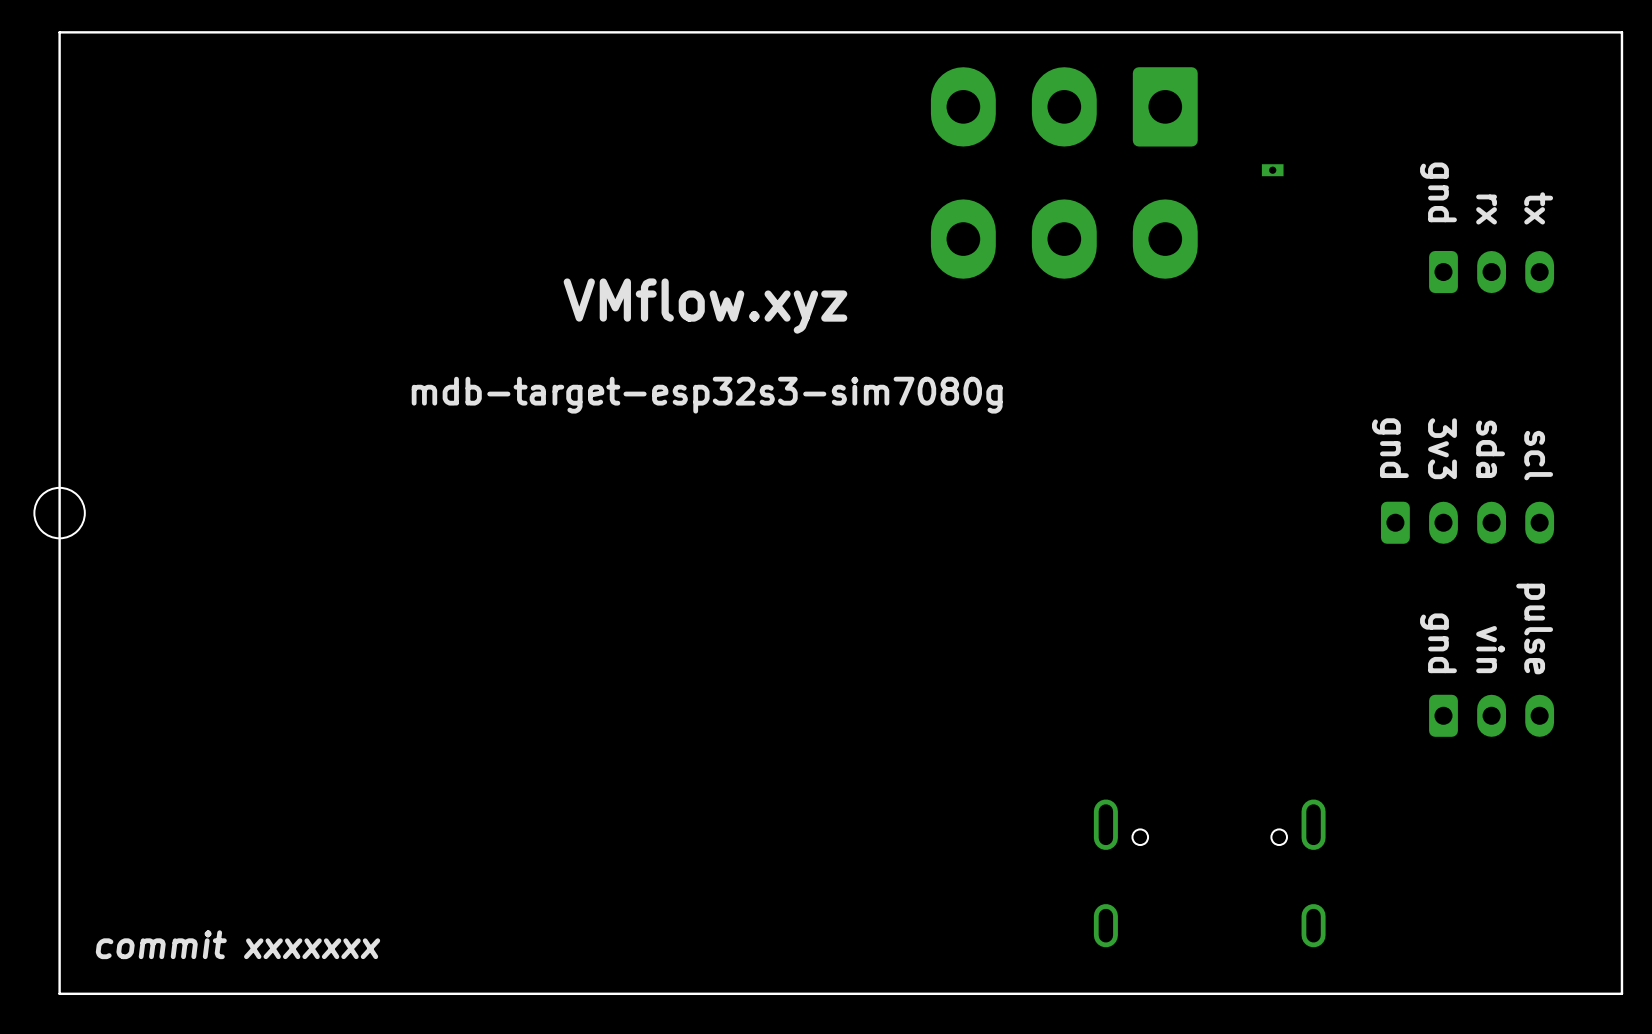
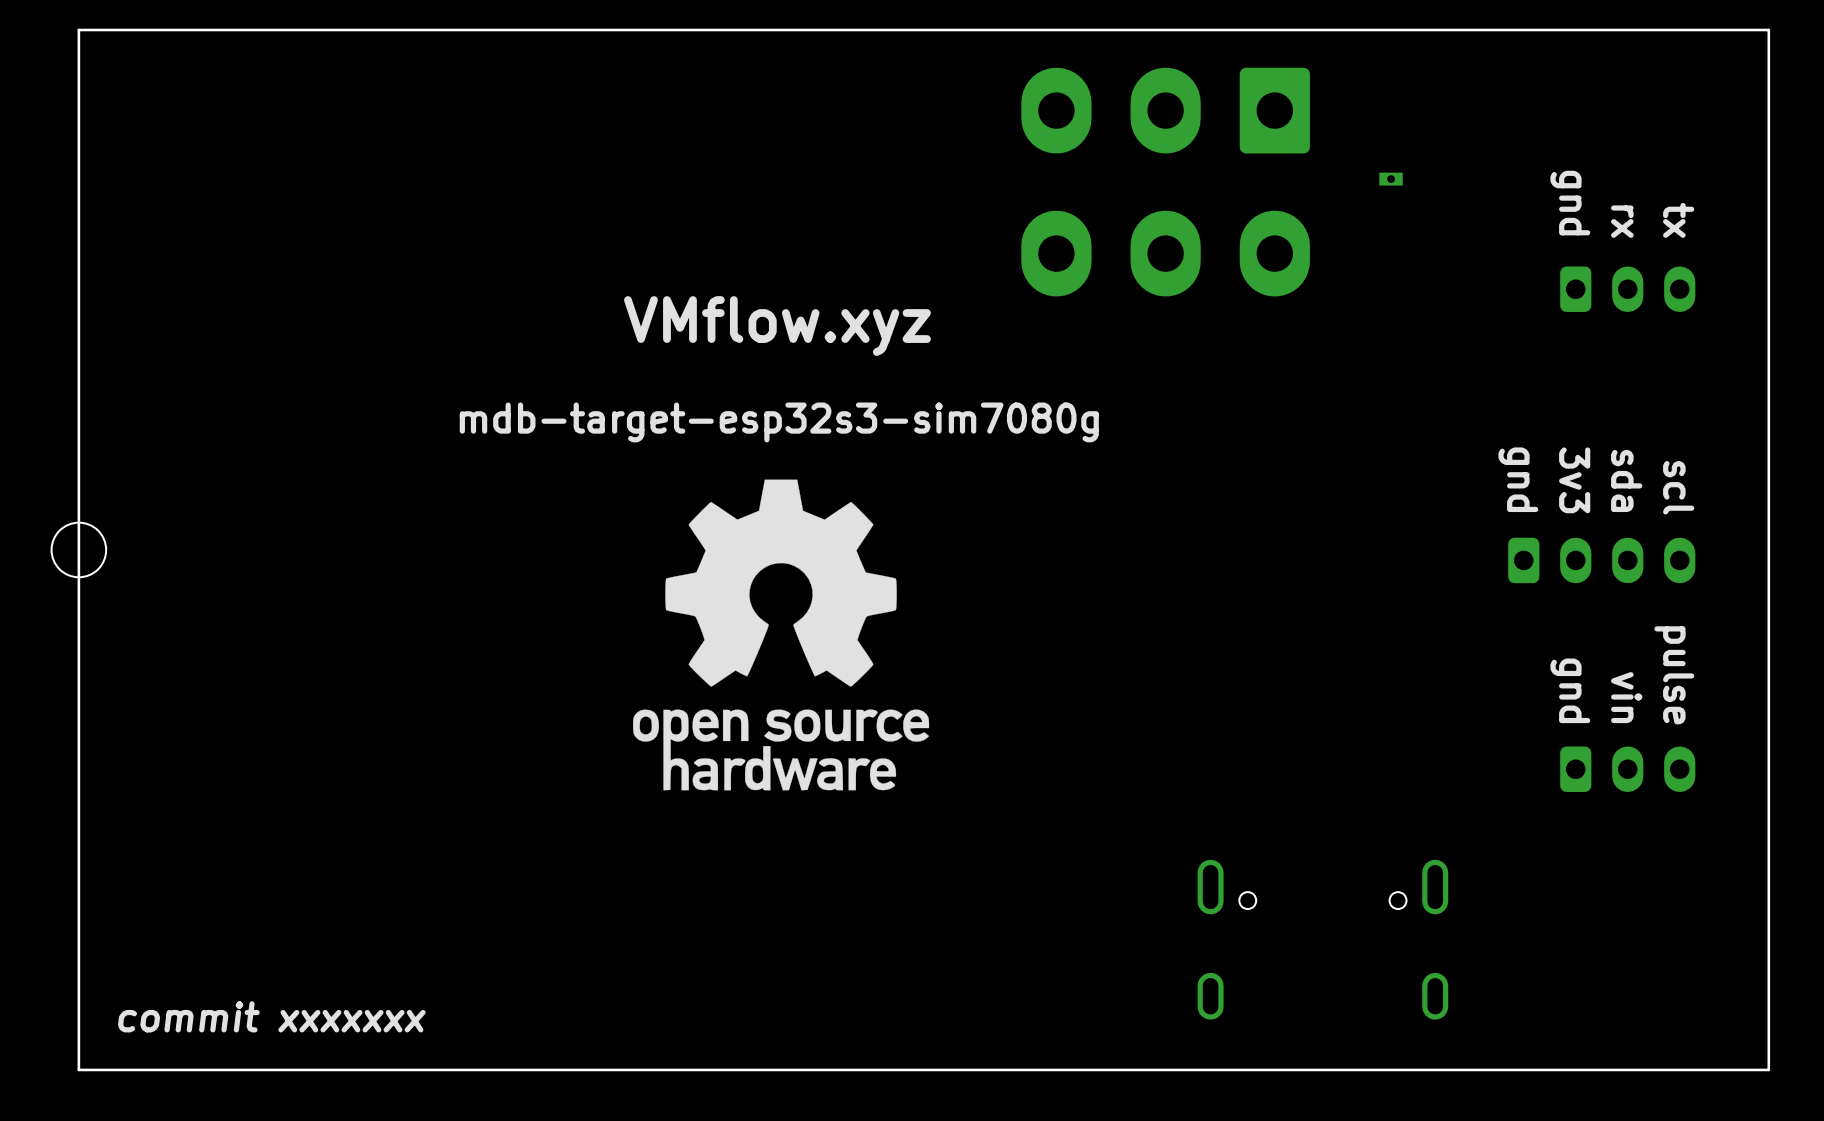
drawing: none -> [632, 479, 930, 791]

